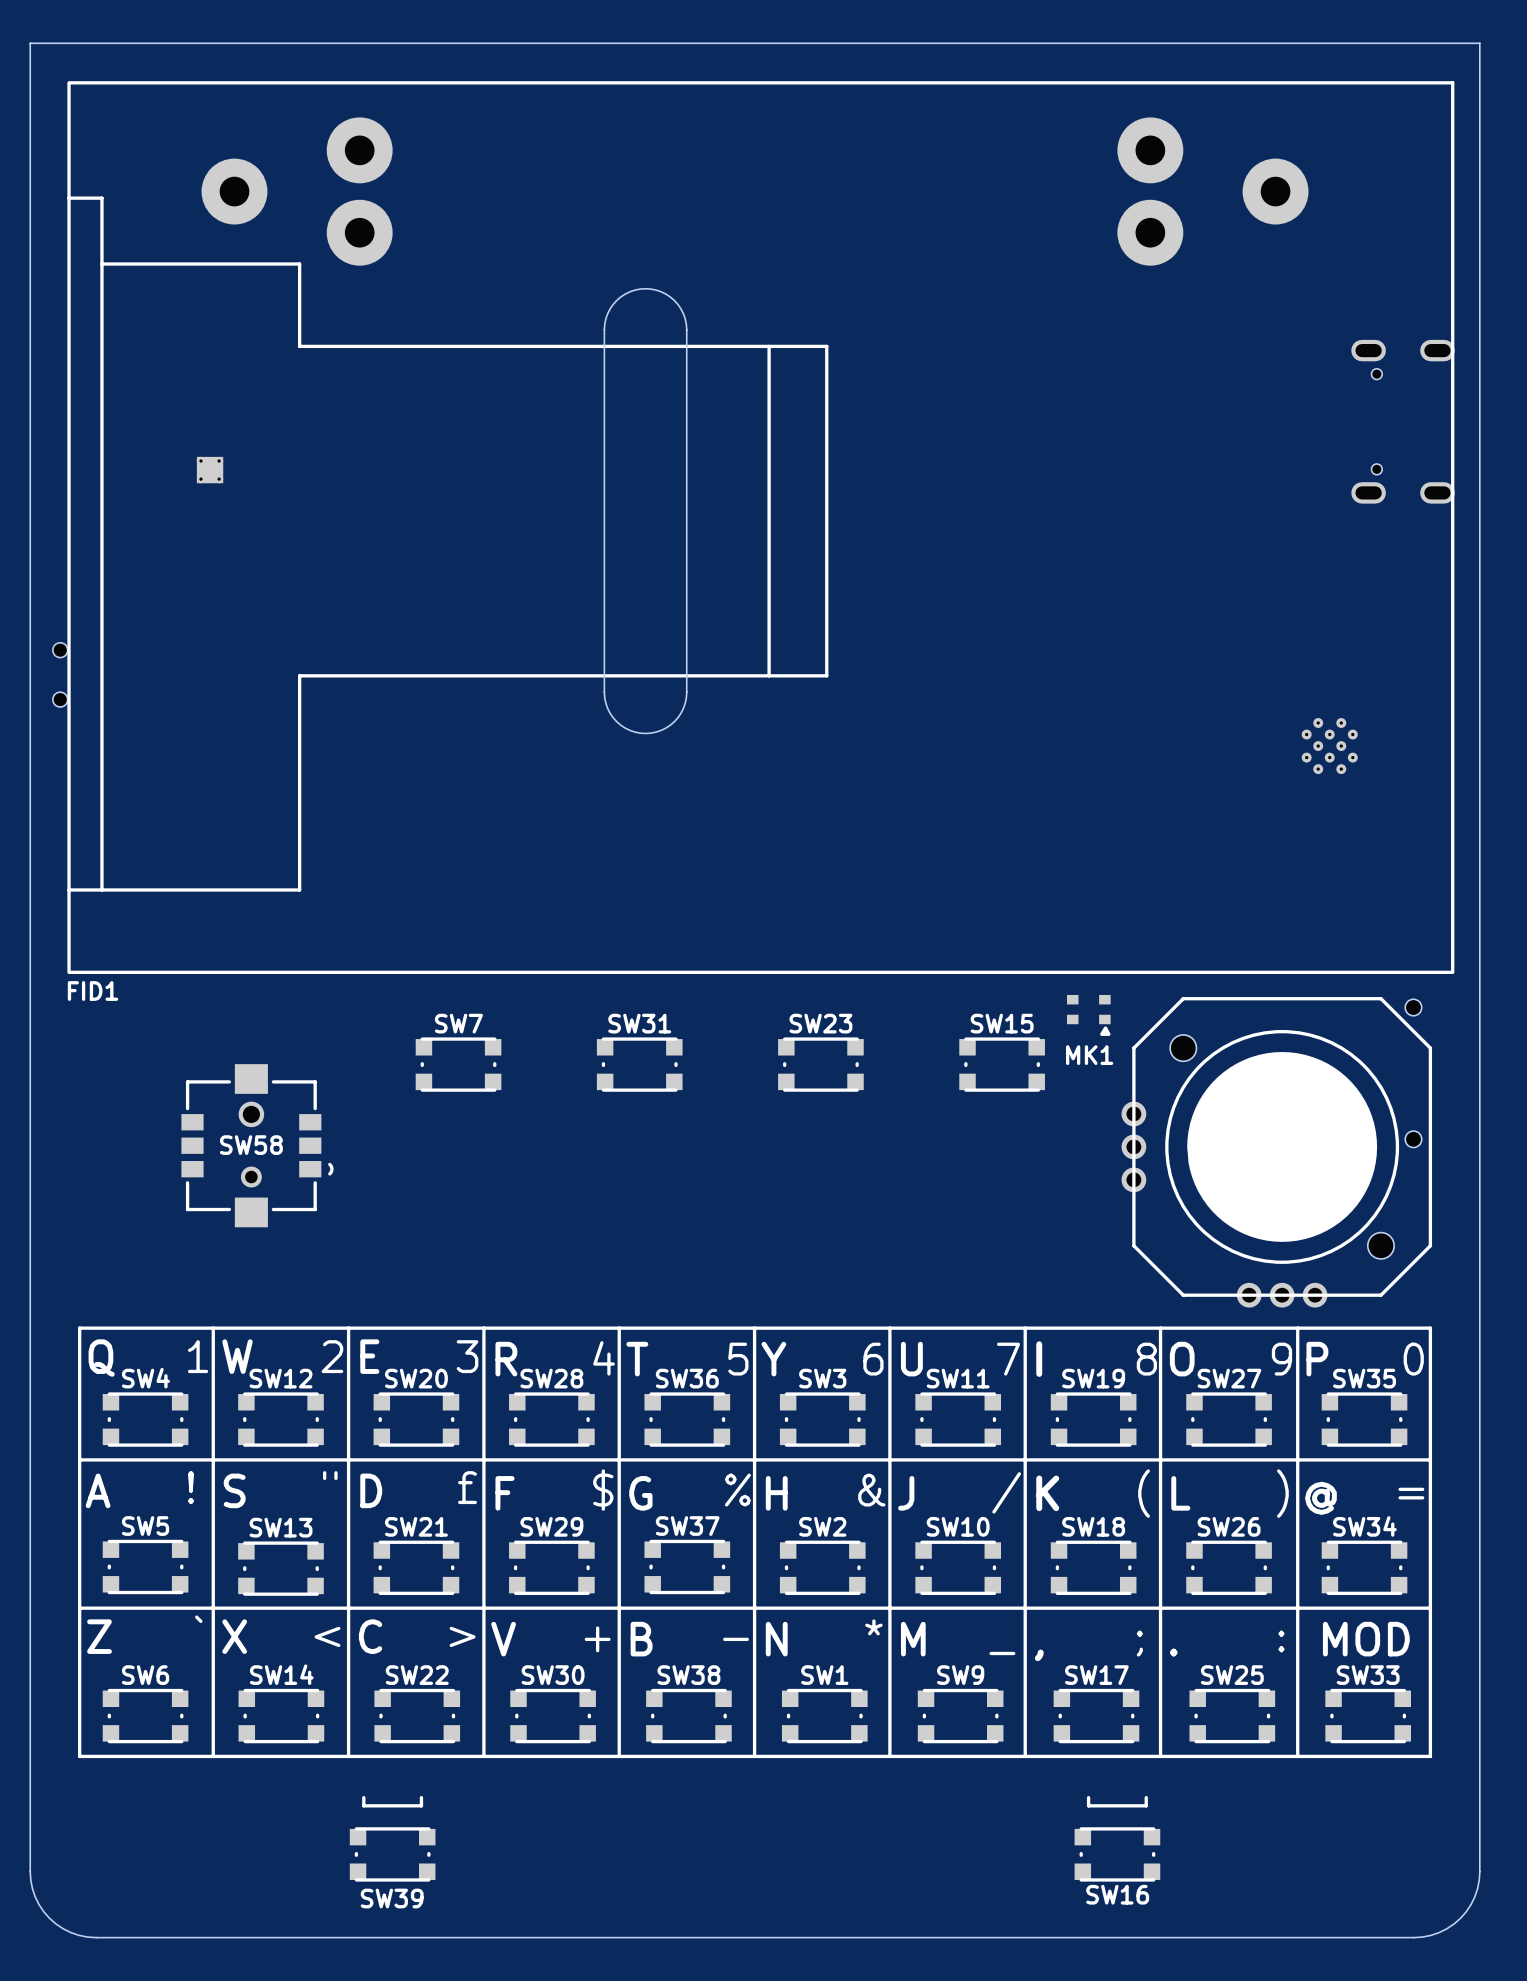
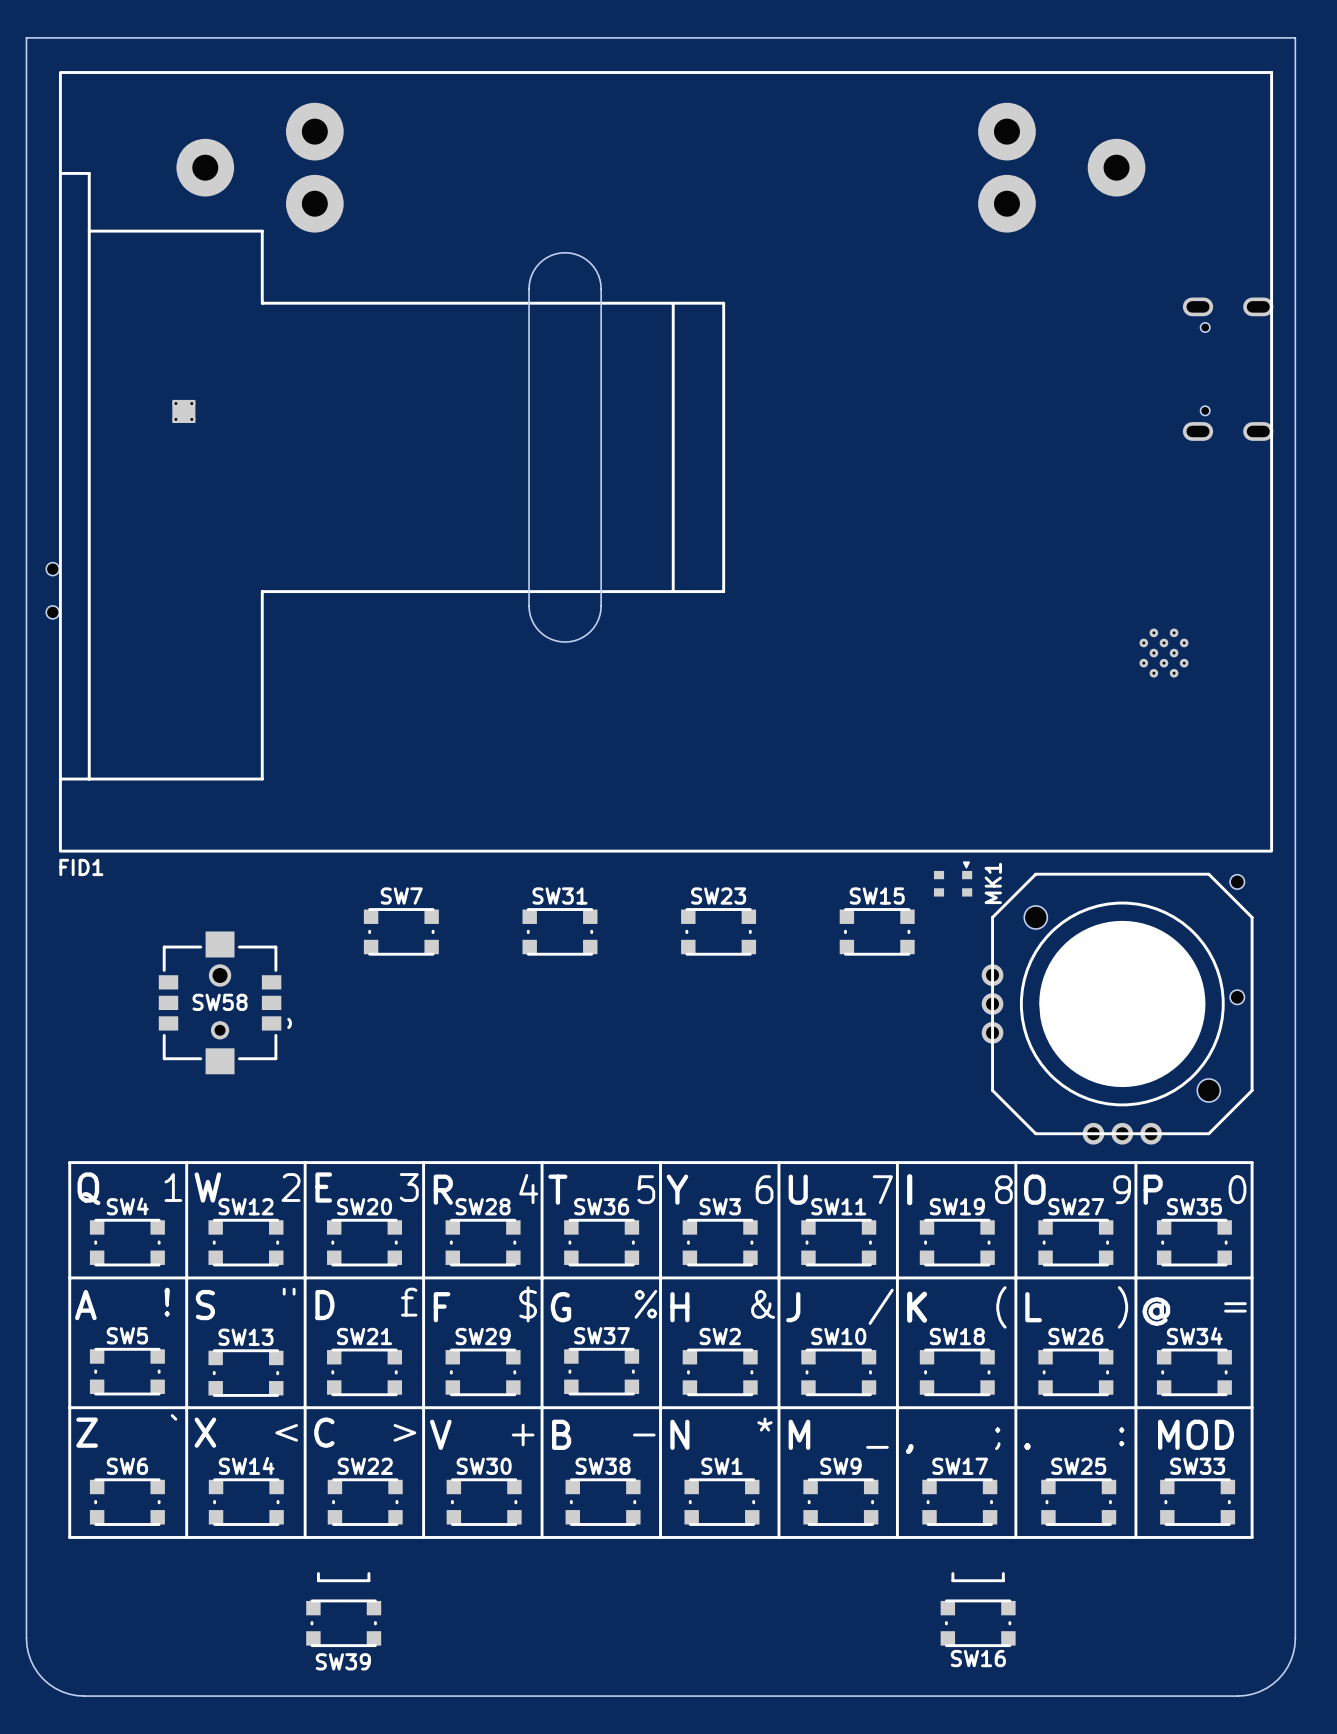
MK1 footprint: [1066, 994, 1111, 1025] -> [933, 861, 973, 897]
drawing: [1100, 1026, 1111, 1036] -> none
MK1 name position: MK1 (1089, 1055) -> MK1 (993, 883)

